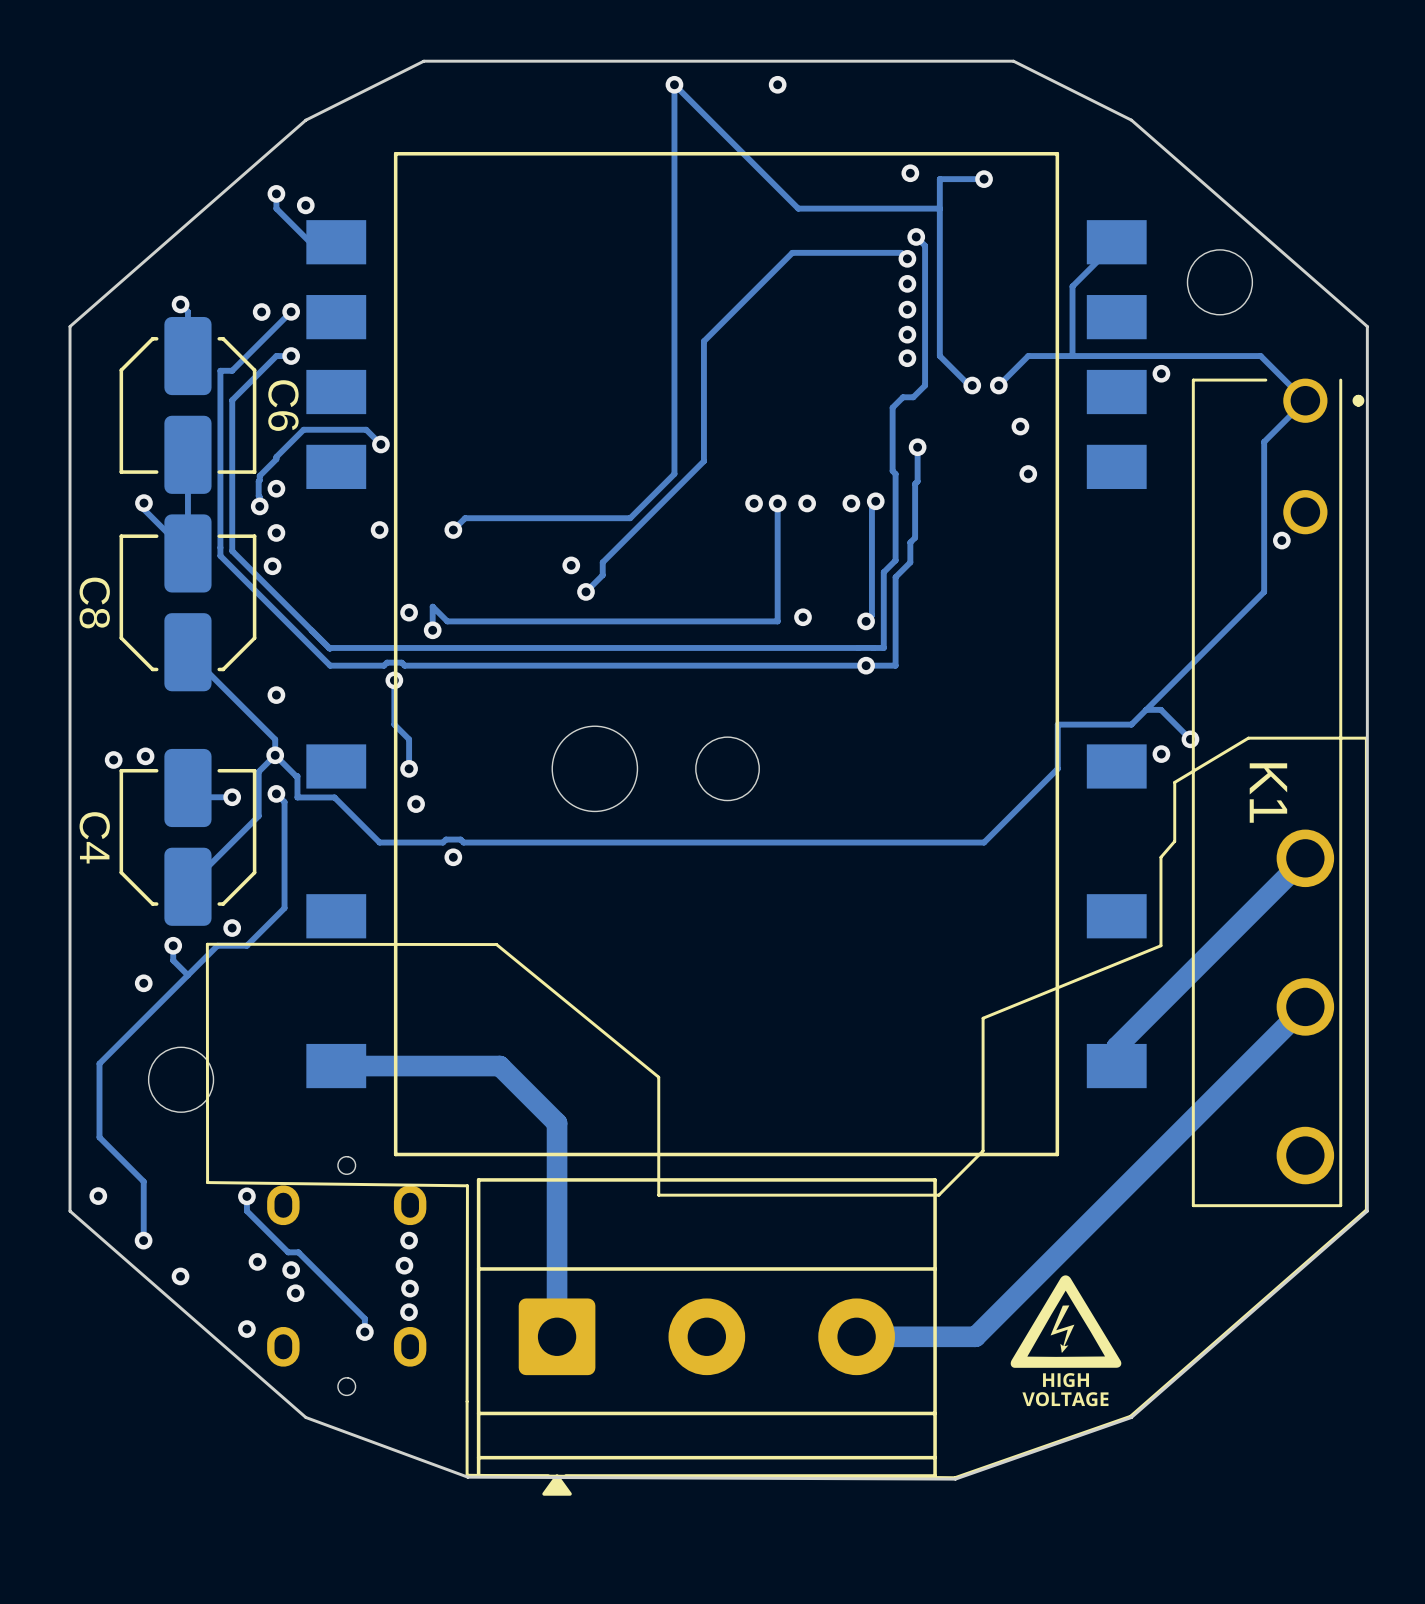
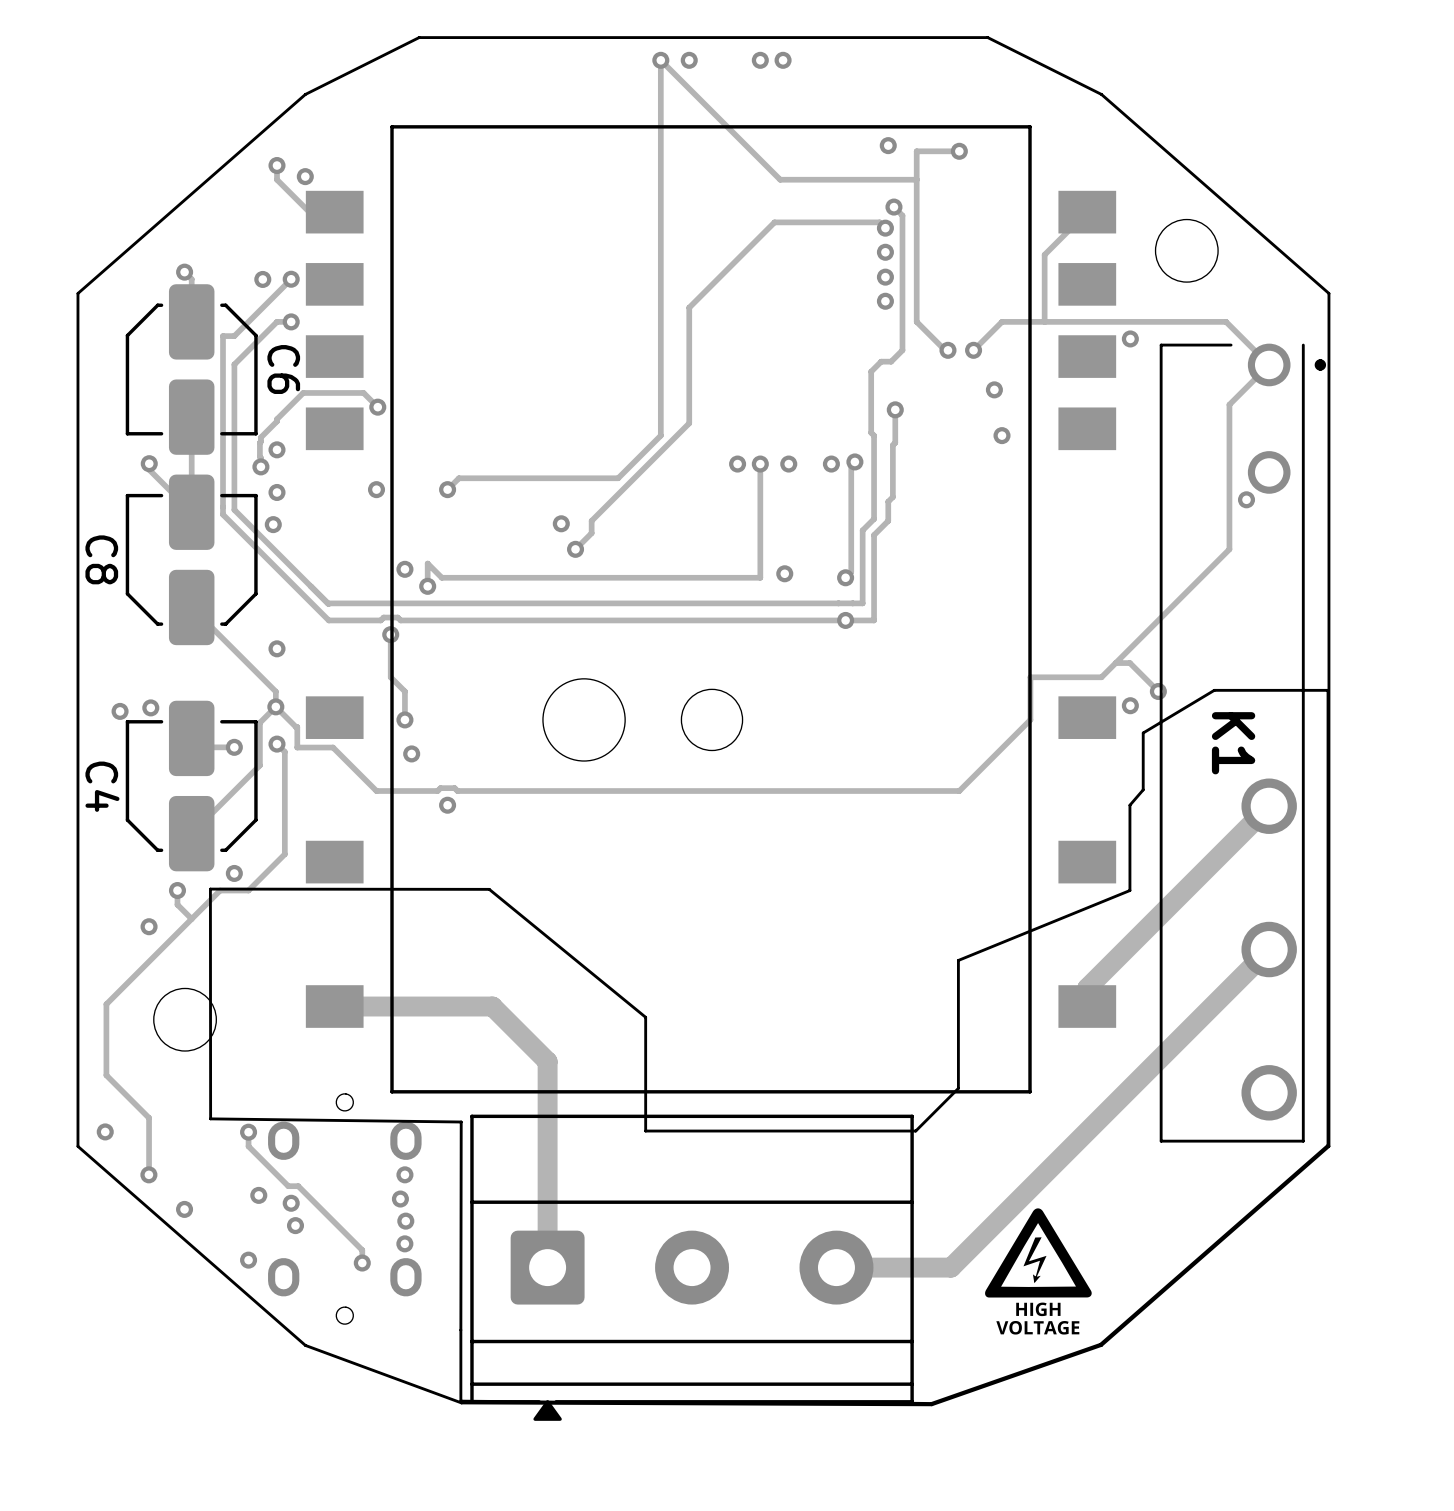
via: none -> (689, 60)
via: none -> (783, 60)
via: (907, 358) -> none

